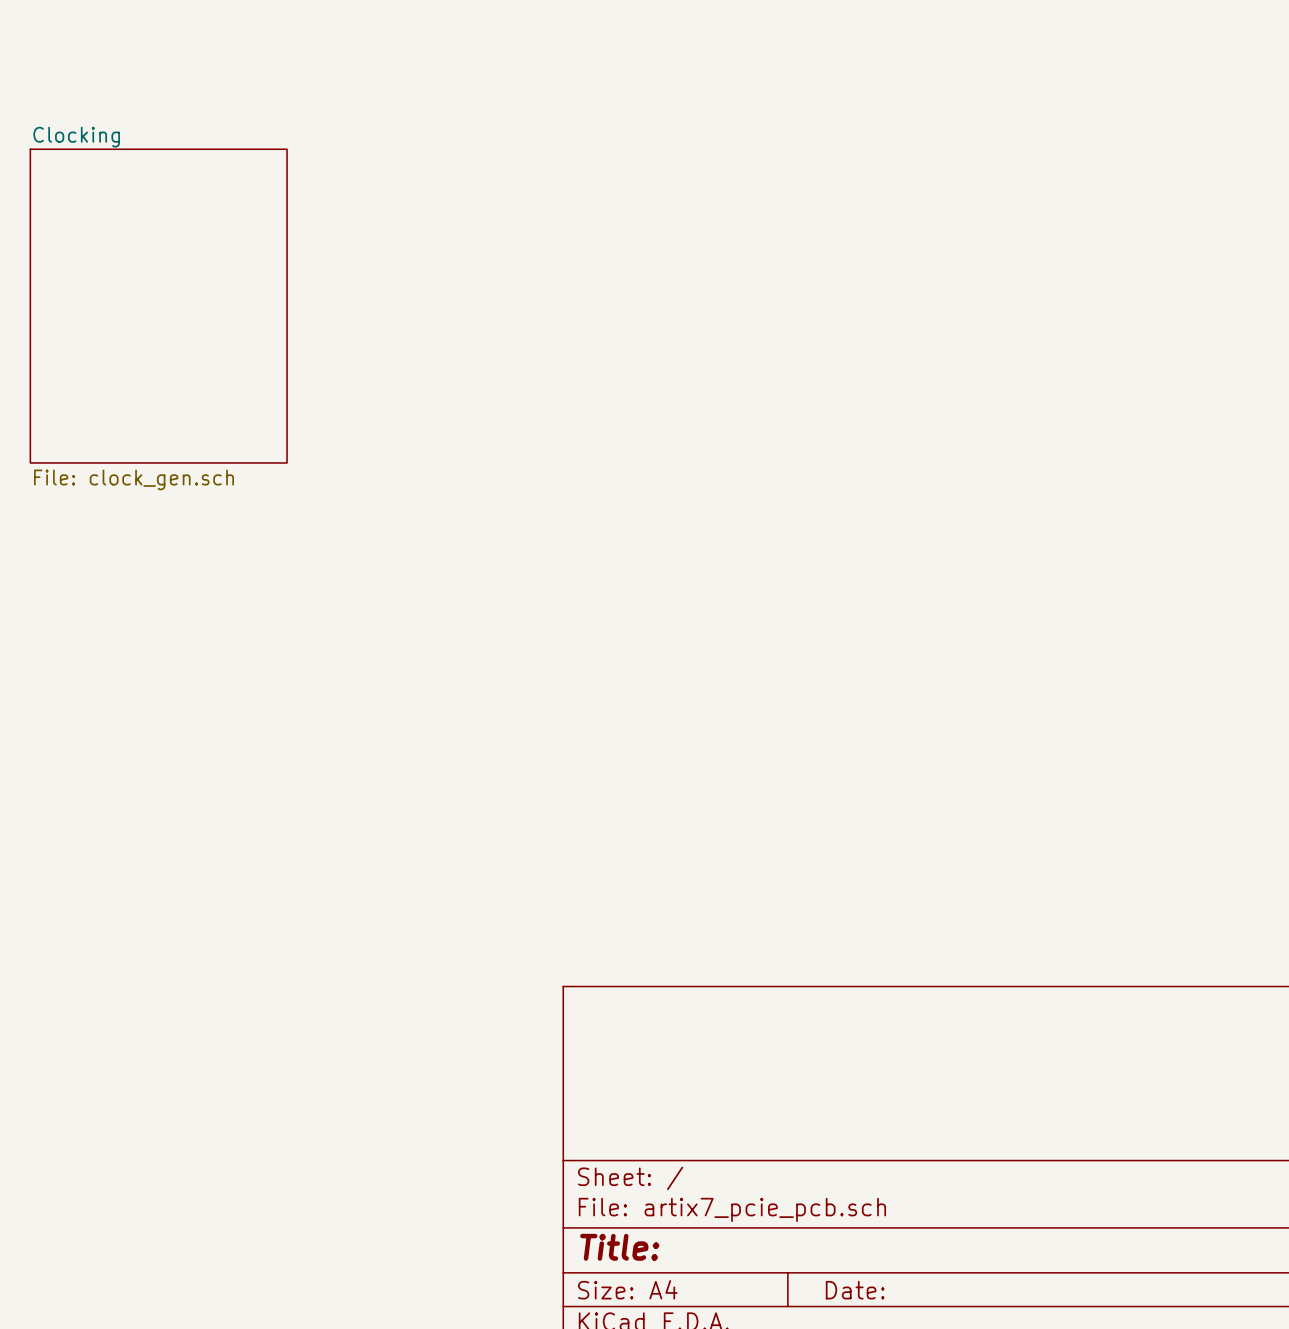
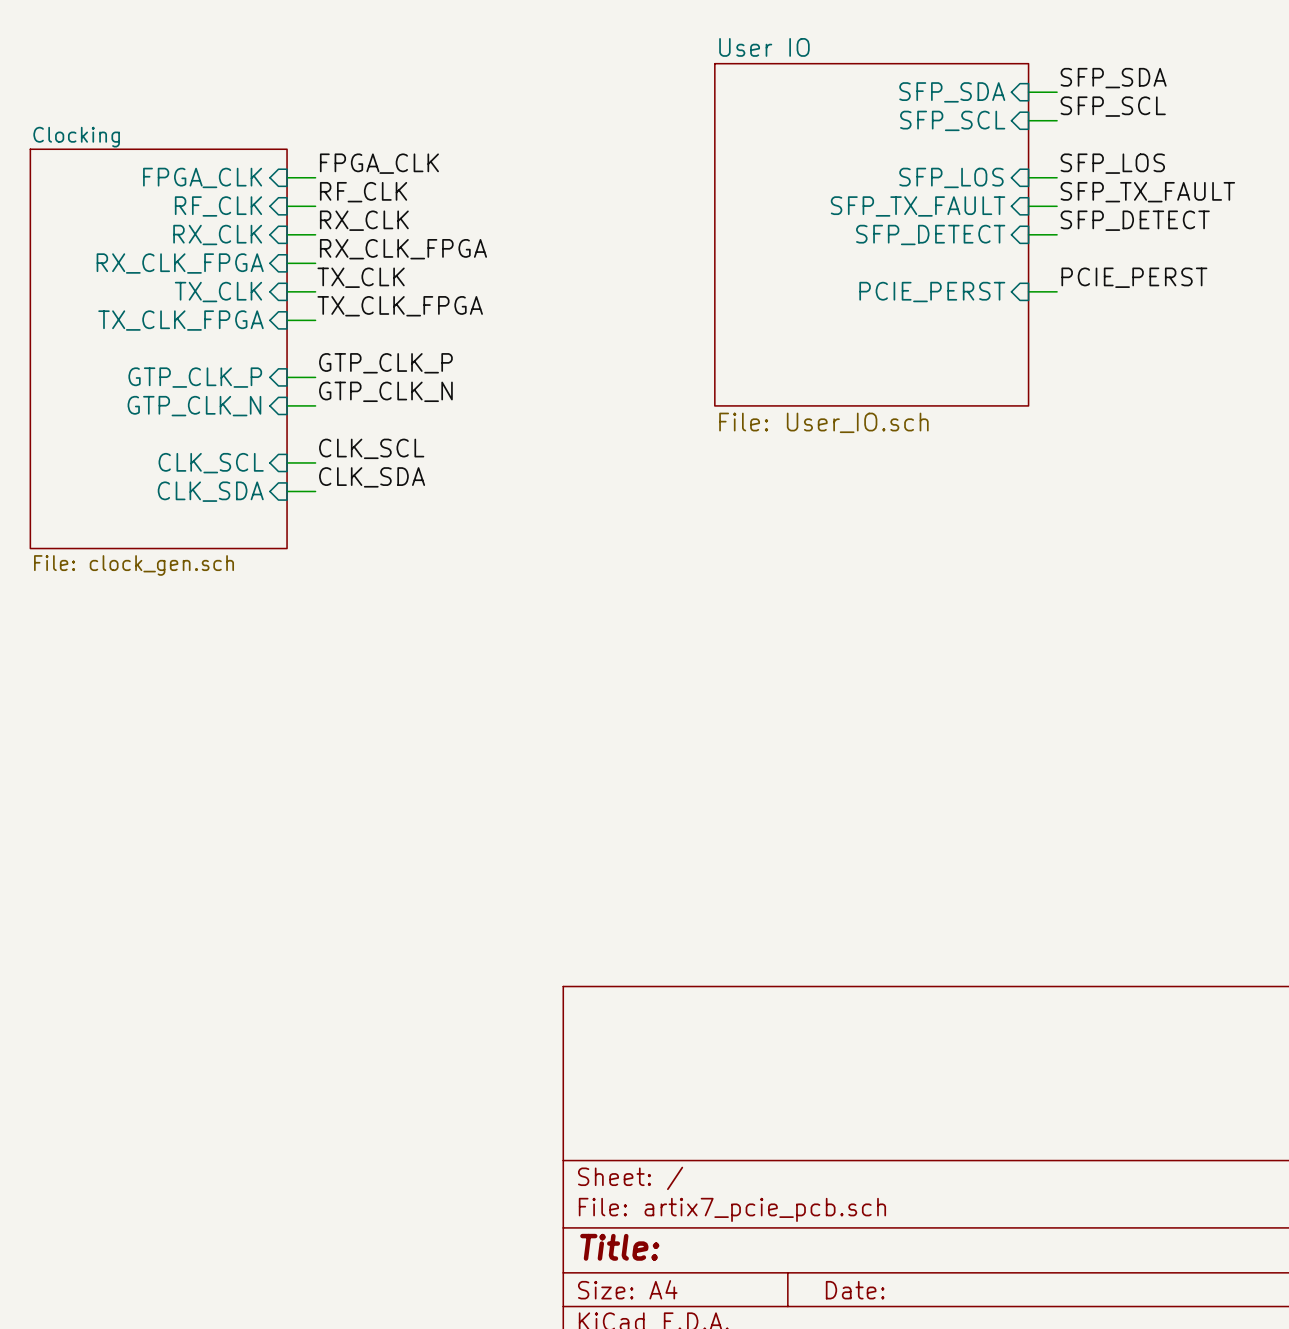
label: none -> SFP_SDA (1113, 78)
sheet pin: none -> SFP_SDA (952, 92)
wire: none -> (1028, 92) (1057, 92)
label: none -> SFP_SCL (1113, 106)
sheet pin: none -> SFP_SCL (952, 120)
wire: none -> (1028, 120) (1057, 120)
label: none -> FPGA_CLK (379, 163)
label: none -> SFP_LOS (1112, 163)
sheet pin: none -> FPGA_CLK (202, 177)
wire: none -> (287, 177) (315, 177)
sheet pin: none -> SFP_LOS (951, 177)
wire: none -> (1028, 177) (1057, 177)
label: none -> RF_CLK (363, 192)
label: none -> SFP_TX_FAULT (1147, 192)
sheet pin: none -> RF_CLK (218, 206)
wire: none -> (287, 206) (315, 206)
sheet pin: none -> SFP_TX_FAULT (918, 206)
wire: none -> (1028, 206) (1057, 206)
label: none -> RX_CLK (364, 220)
label: none -> SFP_DETECT (1135, 220)
sheet pin: none -> RX_CLK (217, 234)
wire: none -> (287, 234) (315, 234)
sheet User IO: none -> File: User_IO.sch (871, 234)
sheet pin: none -> SFP_DETECT (930, 234)
wire: none -> (1028, 234) (1057, 234)
label: none -> RX_CLK_FPGA (403, 249)
sheet pin: none -> RX_CLK_FPGA (180, 263)
wire: none -> (287, 263) (315, 263)
label: none -> TX_CLK (361, 277)
label: none -> PCIE_PERST (1134, 277)
wire: none -> (287, 291) (315, 291)
wire: none -> (1028, 291) (1057, 291)
sheet pin: none -> TX_CLK (218, 292)
sheet pin: none -> PCIE_PERST (932, 292)
sheet Clocking: File: clock_gen.sch (158, 306) -> none
label: none -> TX_CLK_FPGA (400, 306)
sheet pin: none -> TX_CLK_FPGA (181, 320)
wire: none -> (287, 320) (315, 320)
sheet Clocking: none -> File: clock_gen.sch (158, 348)
label: none -> GTP_CLK_P (385, 363)
sheet pin: none -> GTP_CLK_P (195, 377)
wire: none -> (287, 377) (315, 377)
label: none -> GTP_CLK_N (385, 391)
wire: none -> (287, 405) (315, 405)
sheet pin: none -> GTP_CLK_N (194, 406)
label: none -> CLK_SCL (371, 448)
wire: none -> (287, 462) (315, 462)
sheet pin: none -> CLK_SCL (211, 463)
label: none -> CLK_SDA (372, 477)
sheet pin: none -> CLK_SDA (210, 491)
wire: none -> (287, 491) (315, 491)

